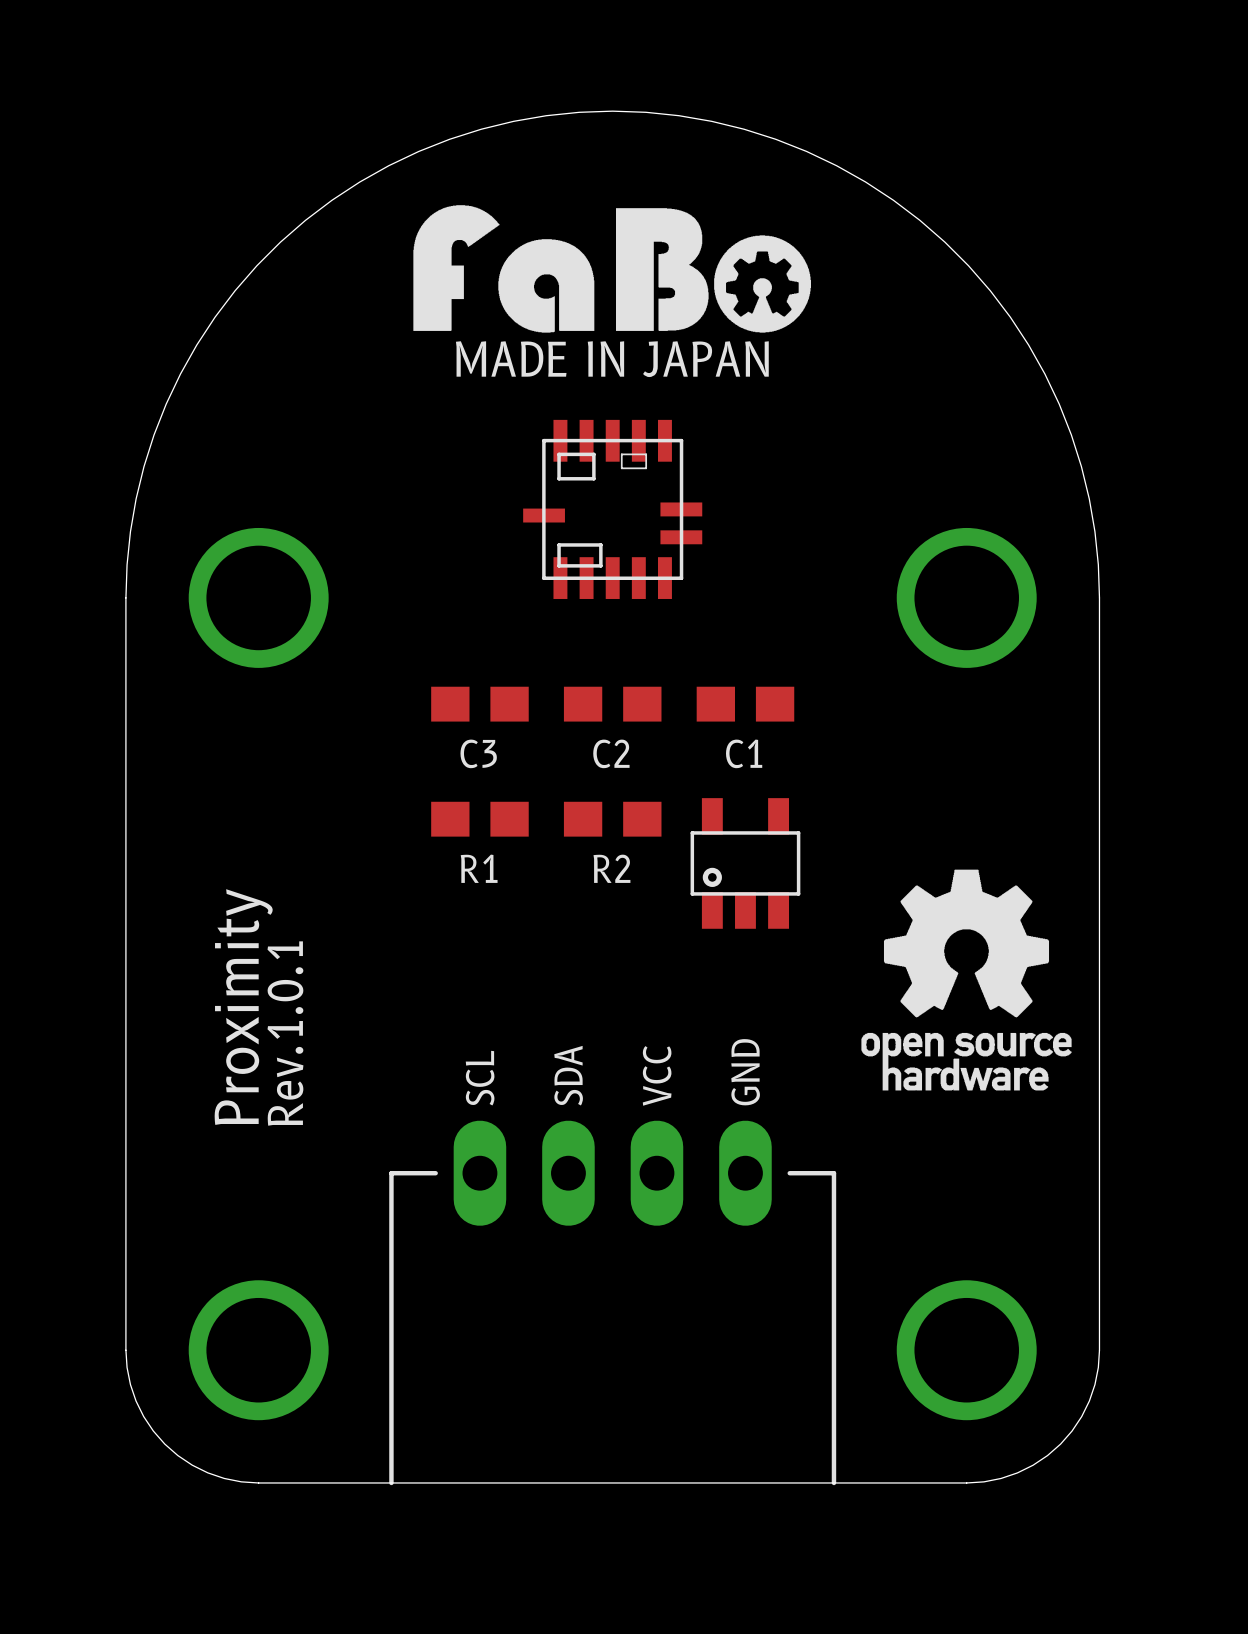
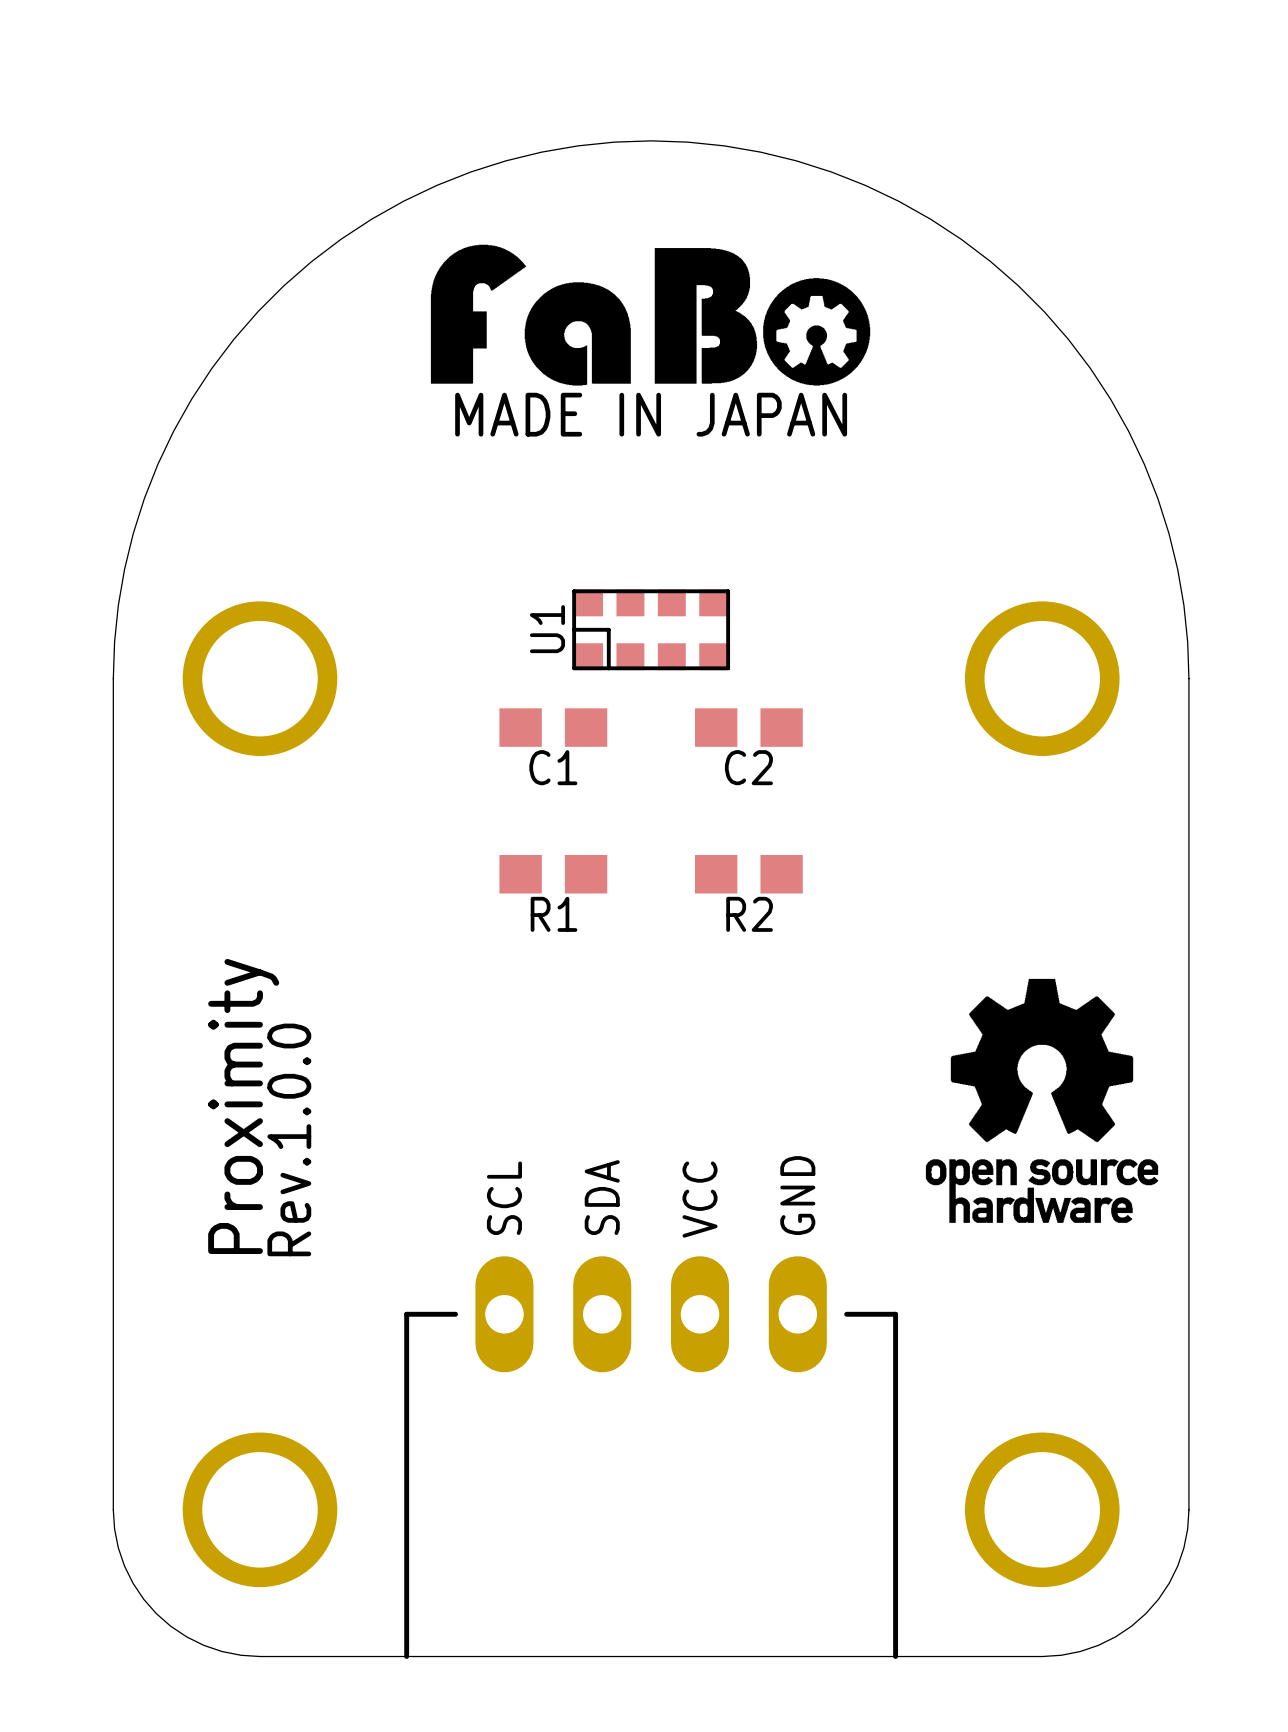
part: (612, 509) -> none
U1: none -> (651, 629)
C3: (479, 704) -> none
C2 position: (612, 704) -> (748, 727)
C1 position: (745, 704) -> (553, 727)
C2 name position: C2 (611, 753) -> C2 (748, 767)
C1 name position: C1 (744, 753) -> C1 (553, 767)
R1 position: (479, 819) -> (553, 874)
R2 position: (612, 819) -> (748, 874)
part: (745, 863) -> none
R1 name position: R1 (479, 868) -> R1 (554, 914)
R2 name position: R2 (611, 868) -> R2 (749, 914)
text: Rev.1.0.1 (285, 1033) -> Rev.1.0.0 (289, 1139)

